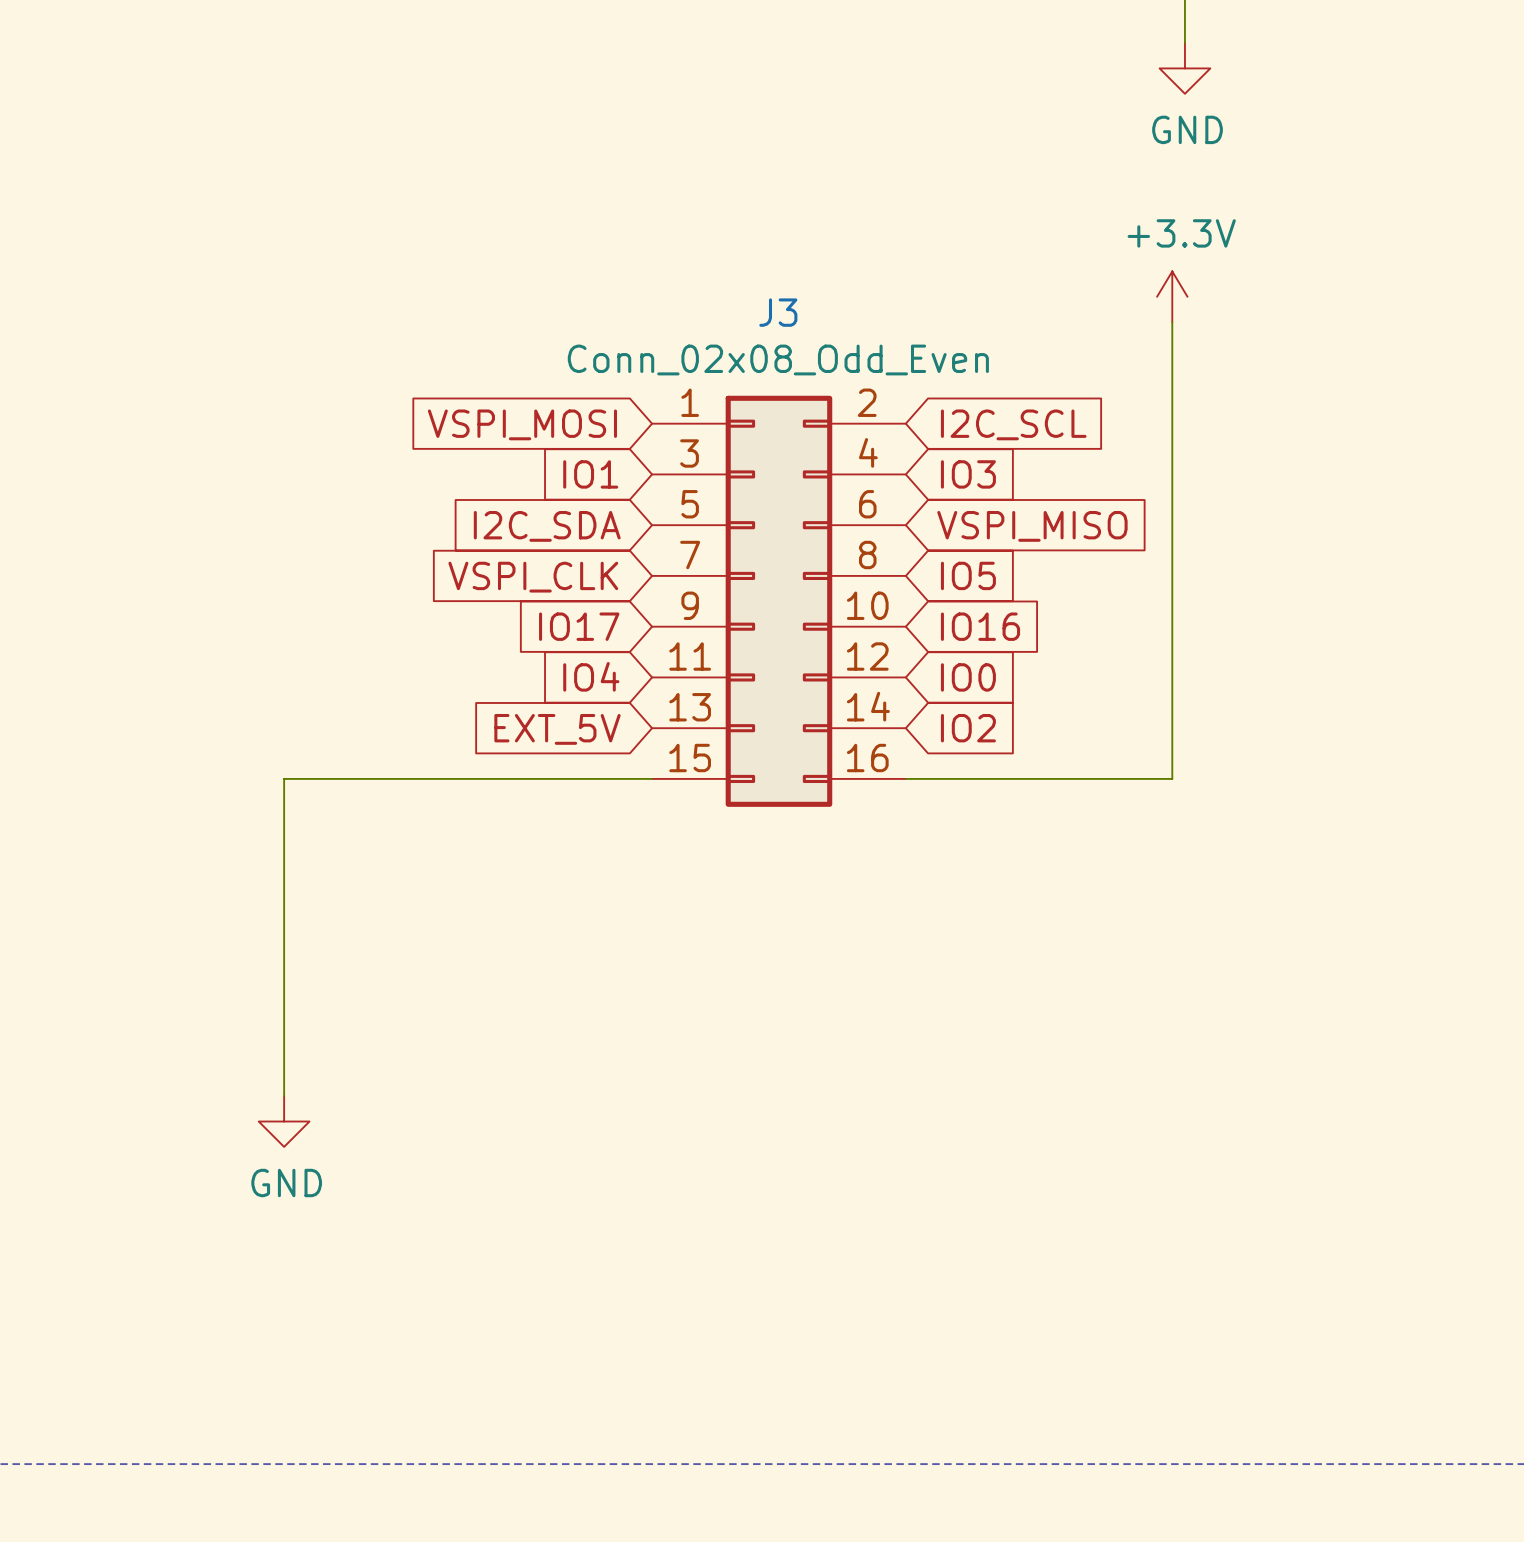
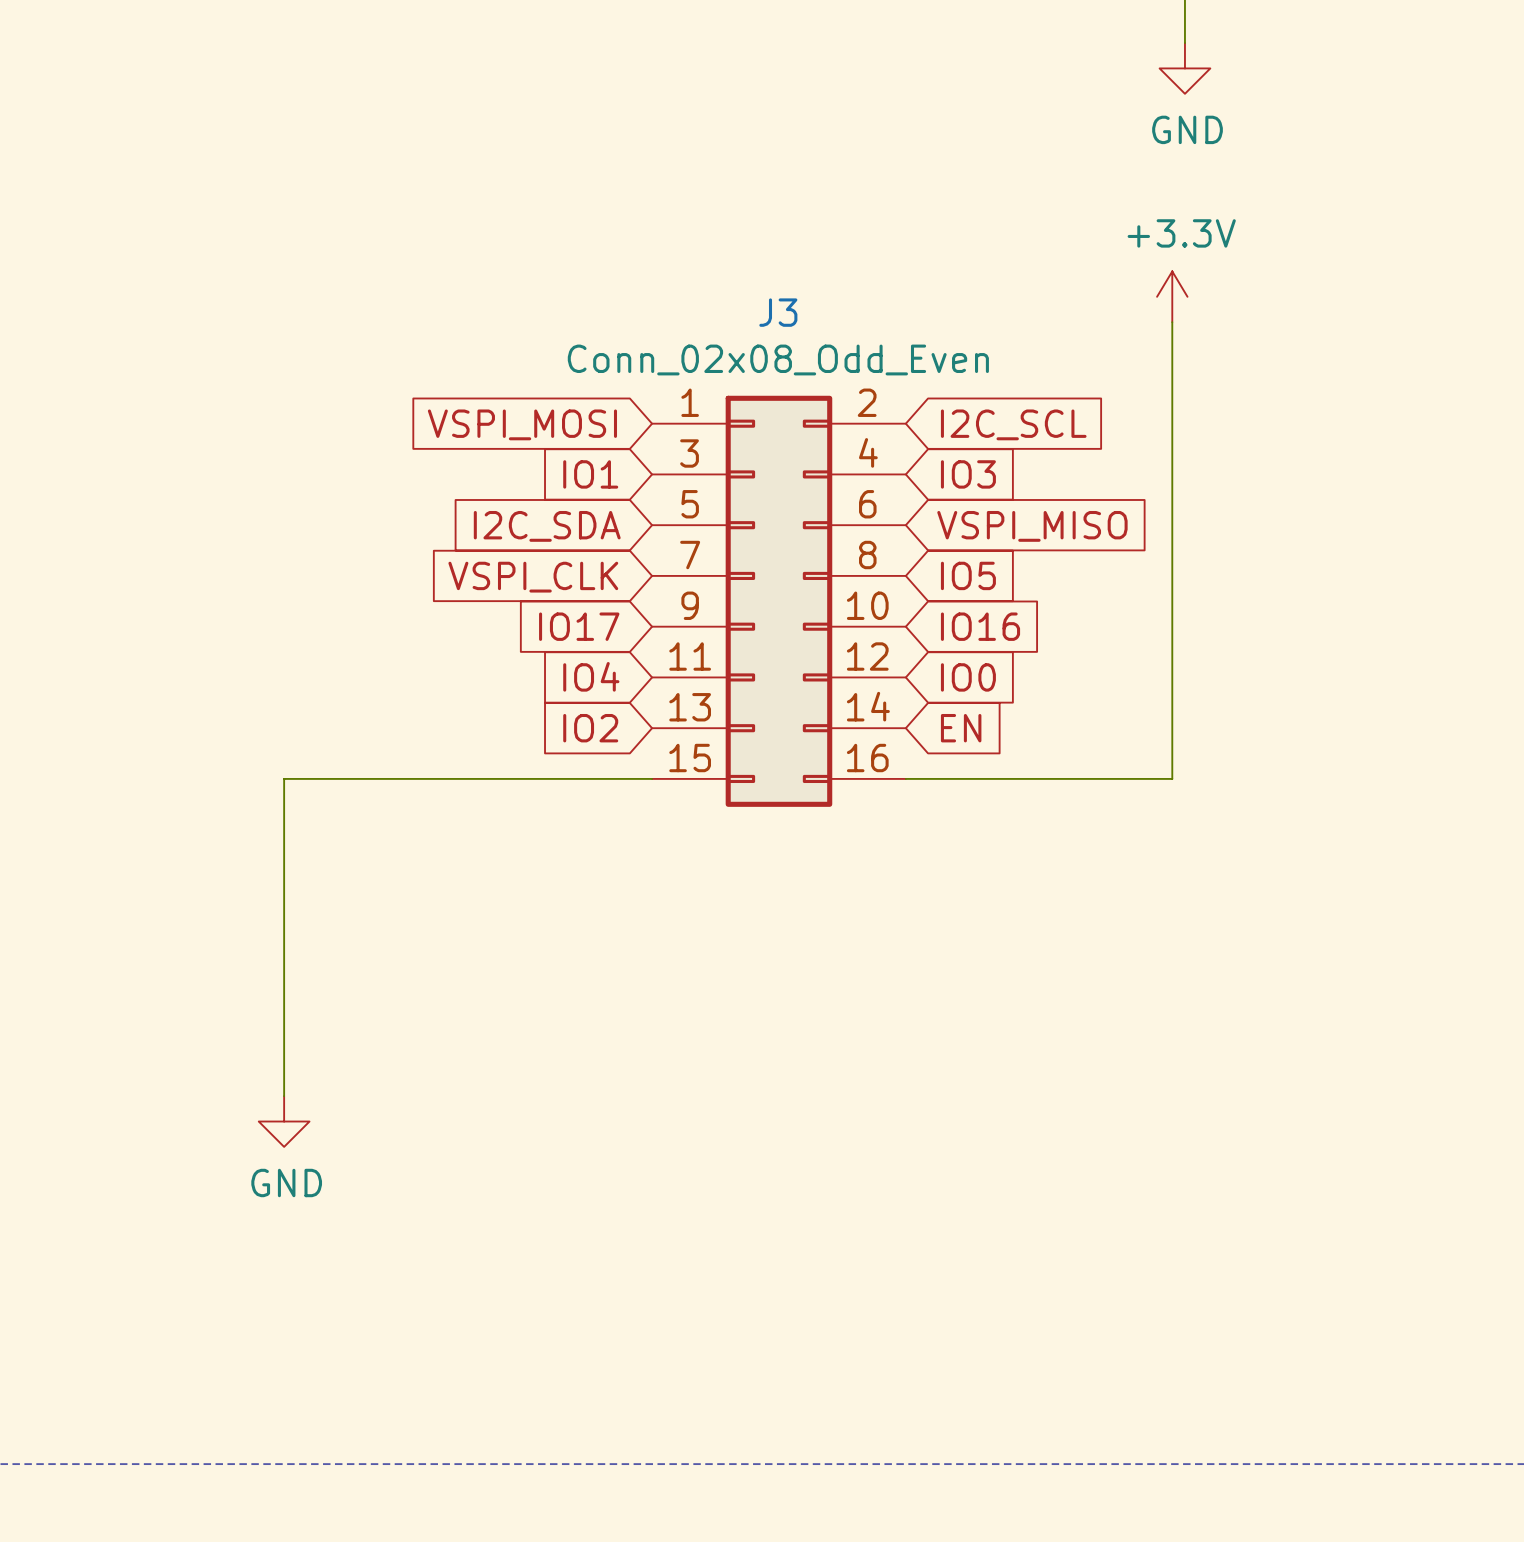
global label: IO2 (968, 728) -> EN (961, 728)
global label: EXT_5V (557, 729) -> IO2 (590, 728)

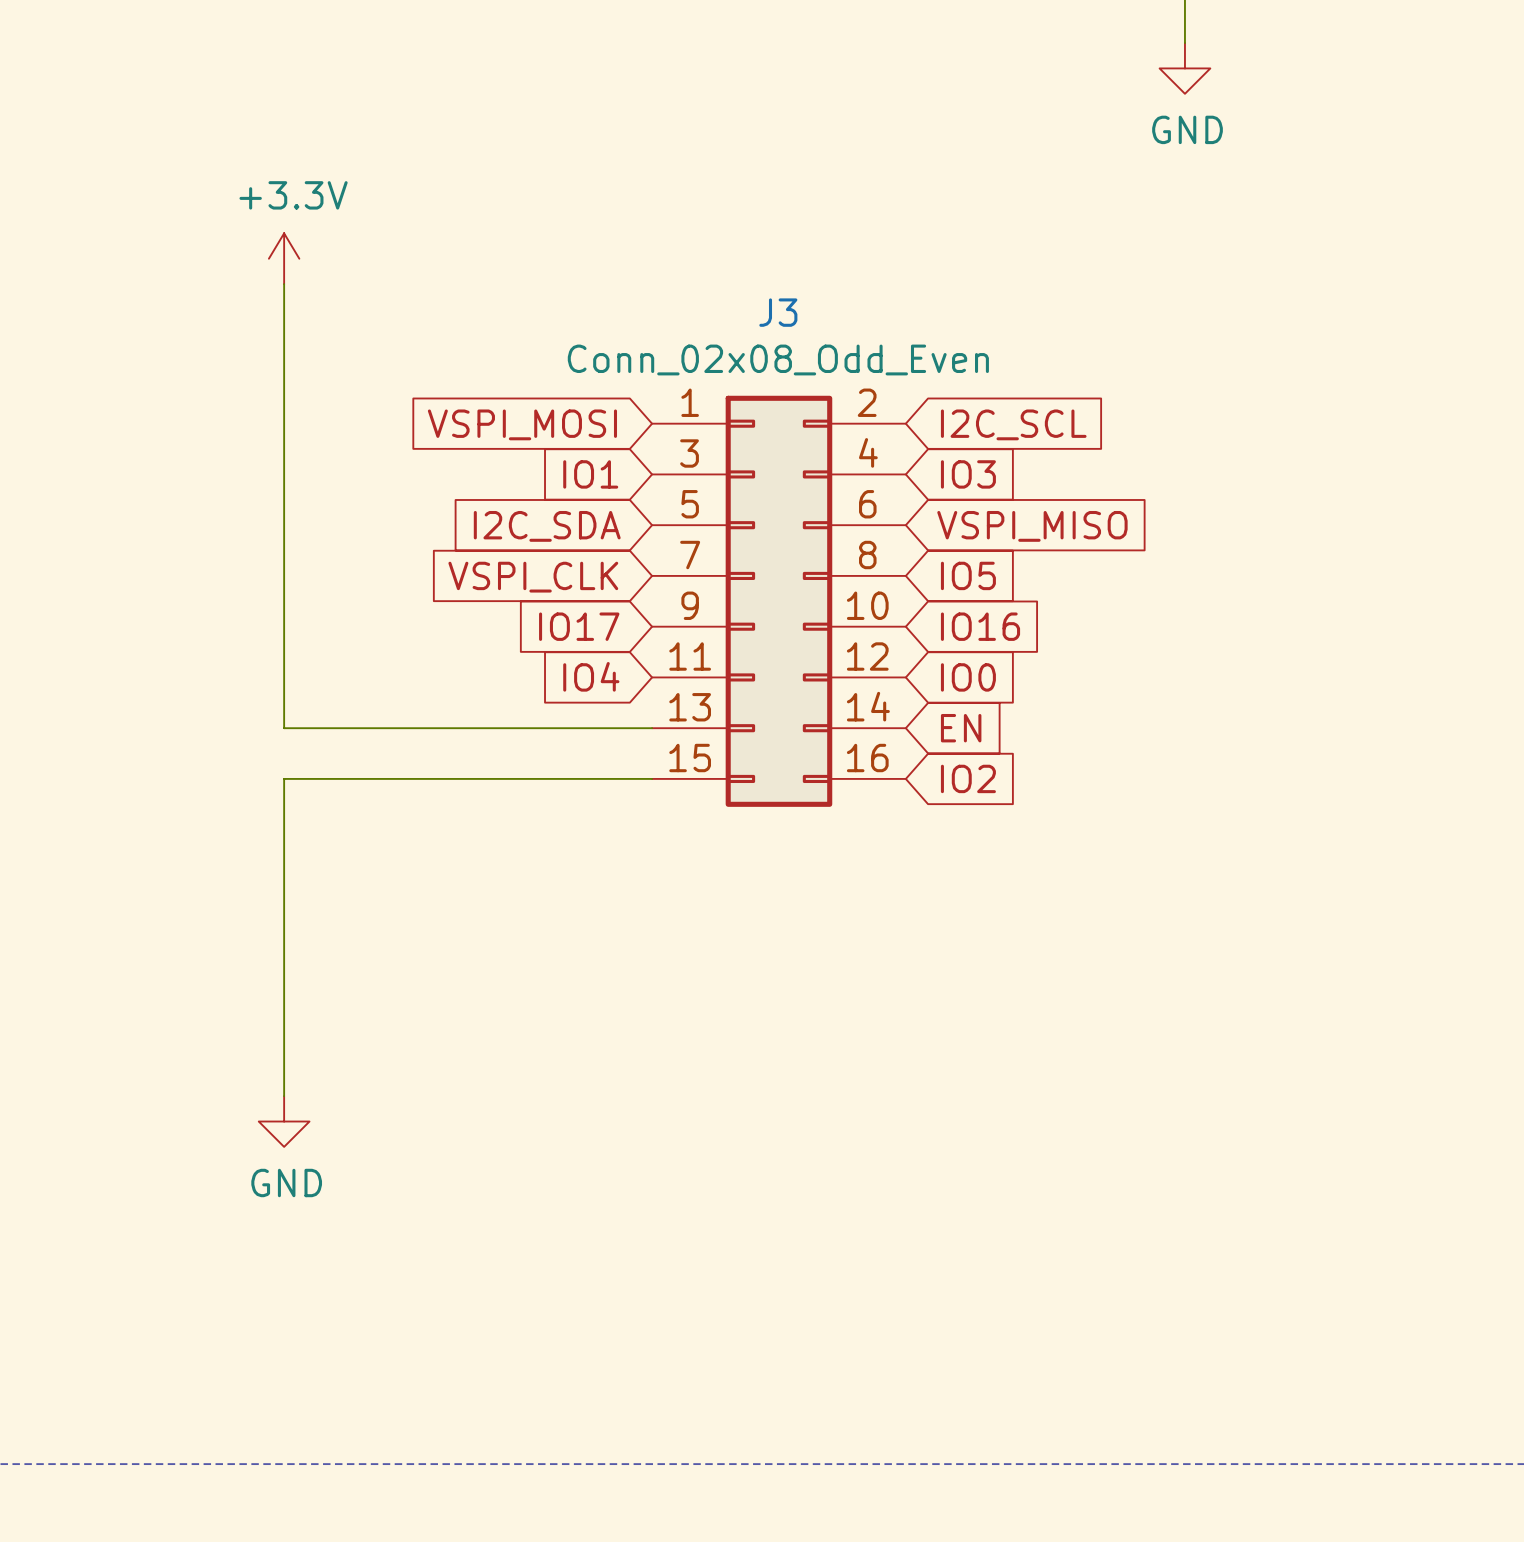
power symbol: none -> +3.3V (284, 258)
wire: none -> (284, 284) (284, 728) (652, 728)
power symbol: +3.3V (1172, 296) -> none
wire: (1172, 322) (1172, 778) (905, 778) -> none
global label rotation: 0° (590, 728) -> 180° (968, 778)
global label position: IO2 (590, 728) -> IO2 (968, 778)

